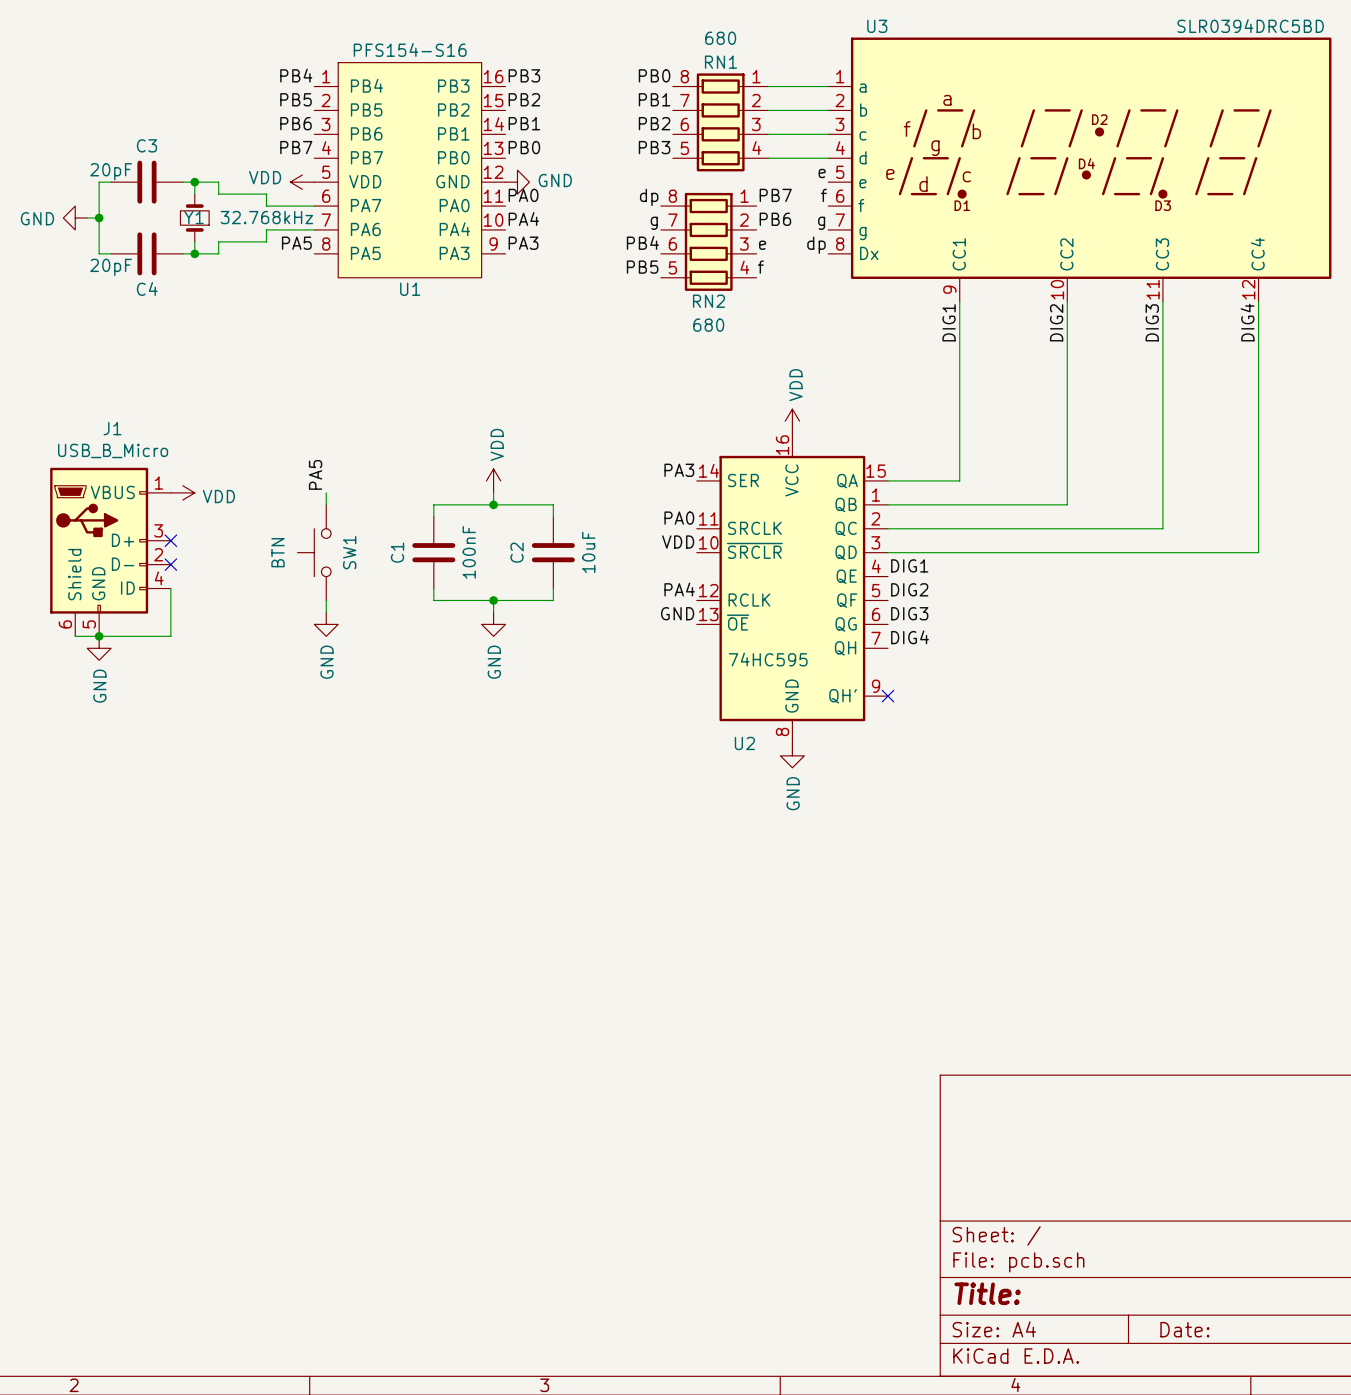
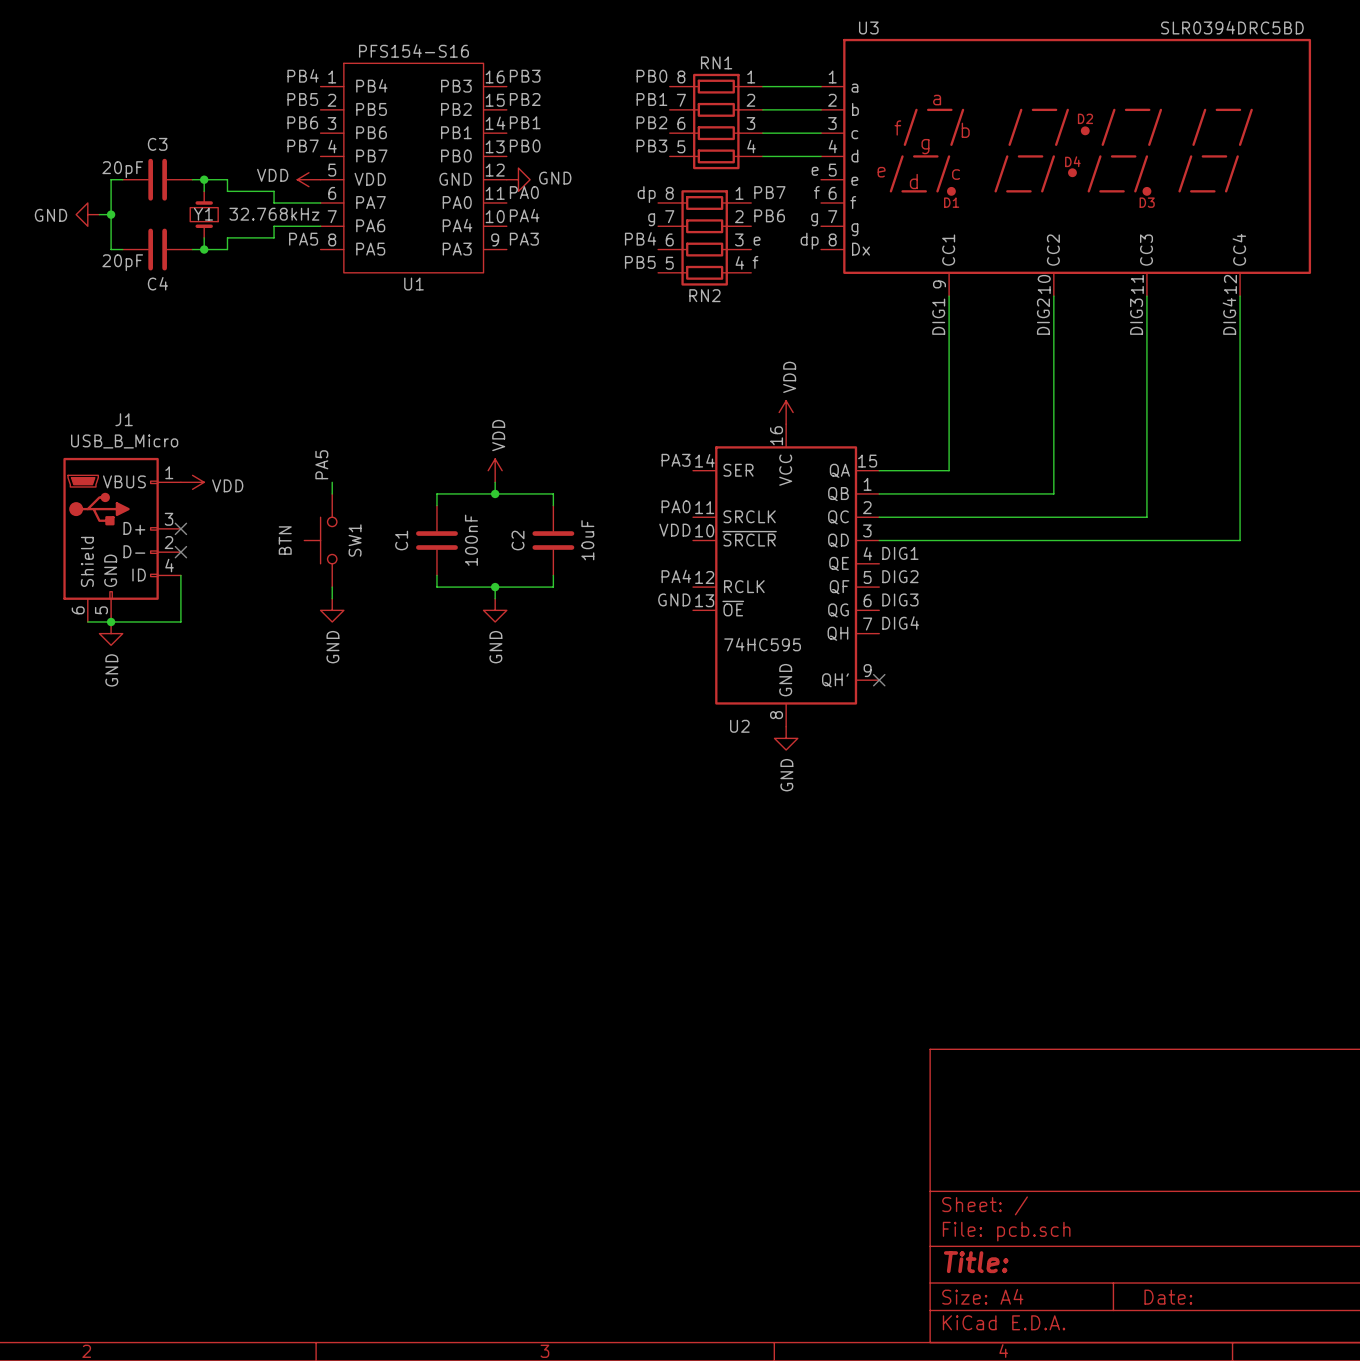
RN1 value: 680 (720, 38) -> none
RN2 value: 680 (708, 325) -> none

